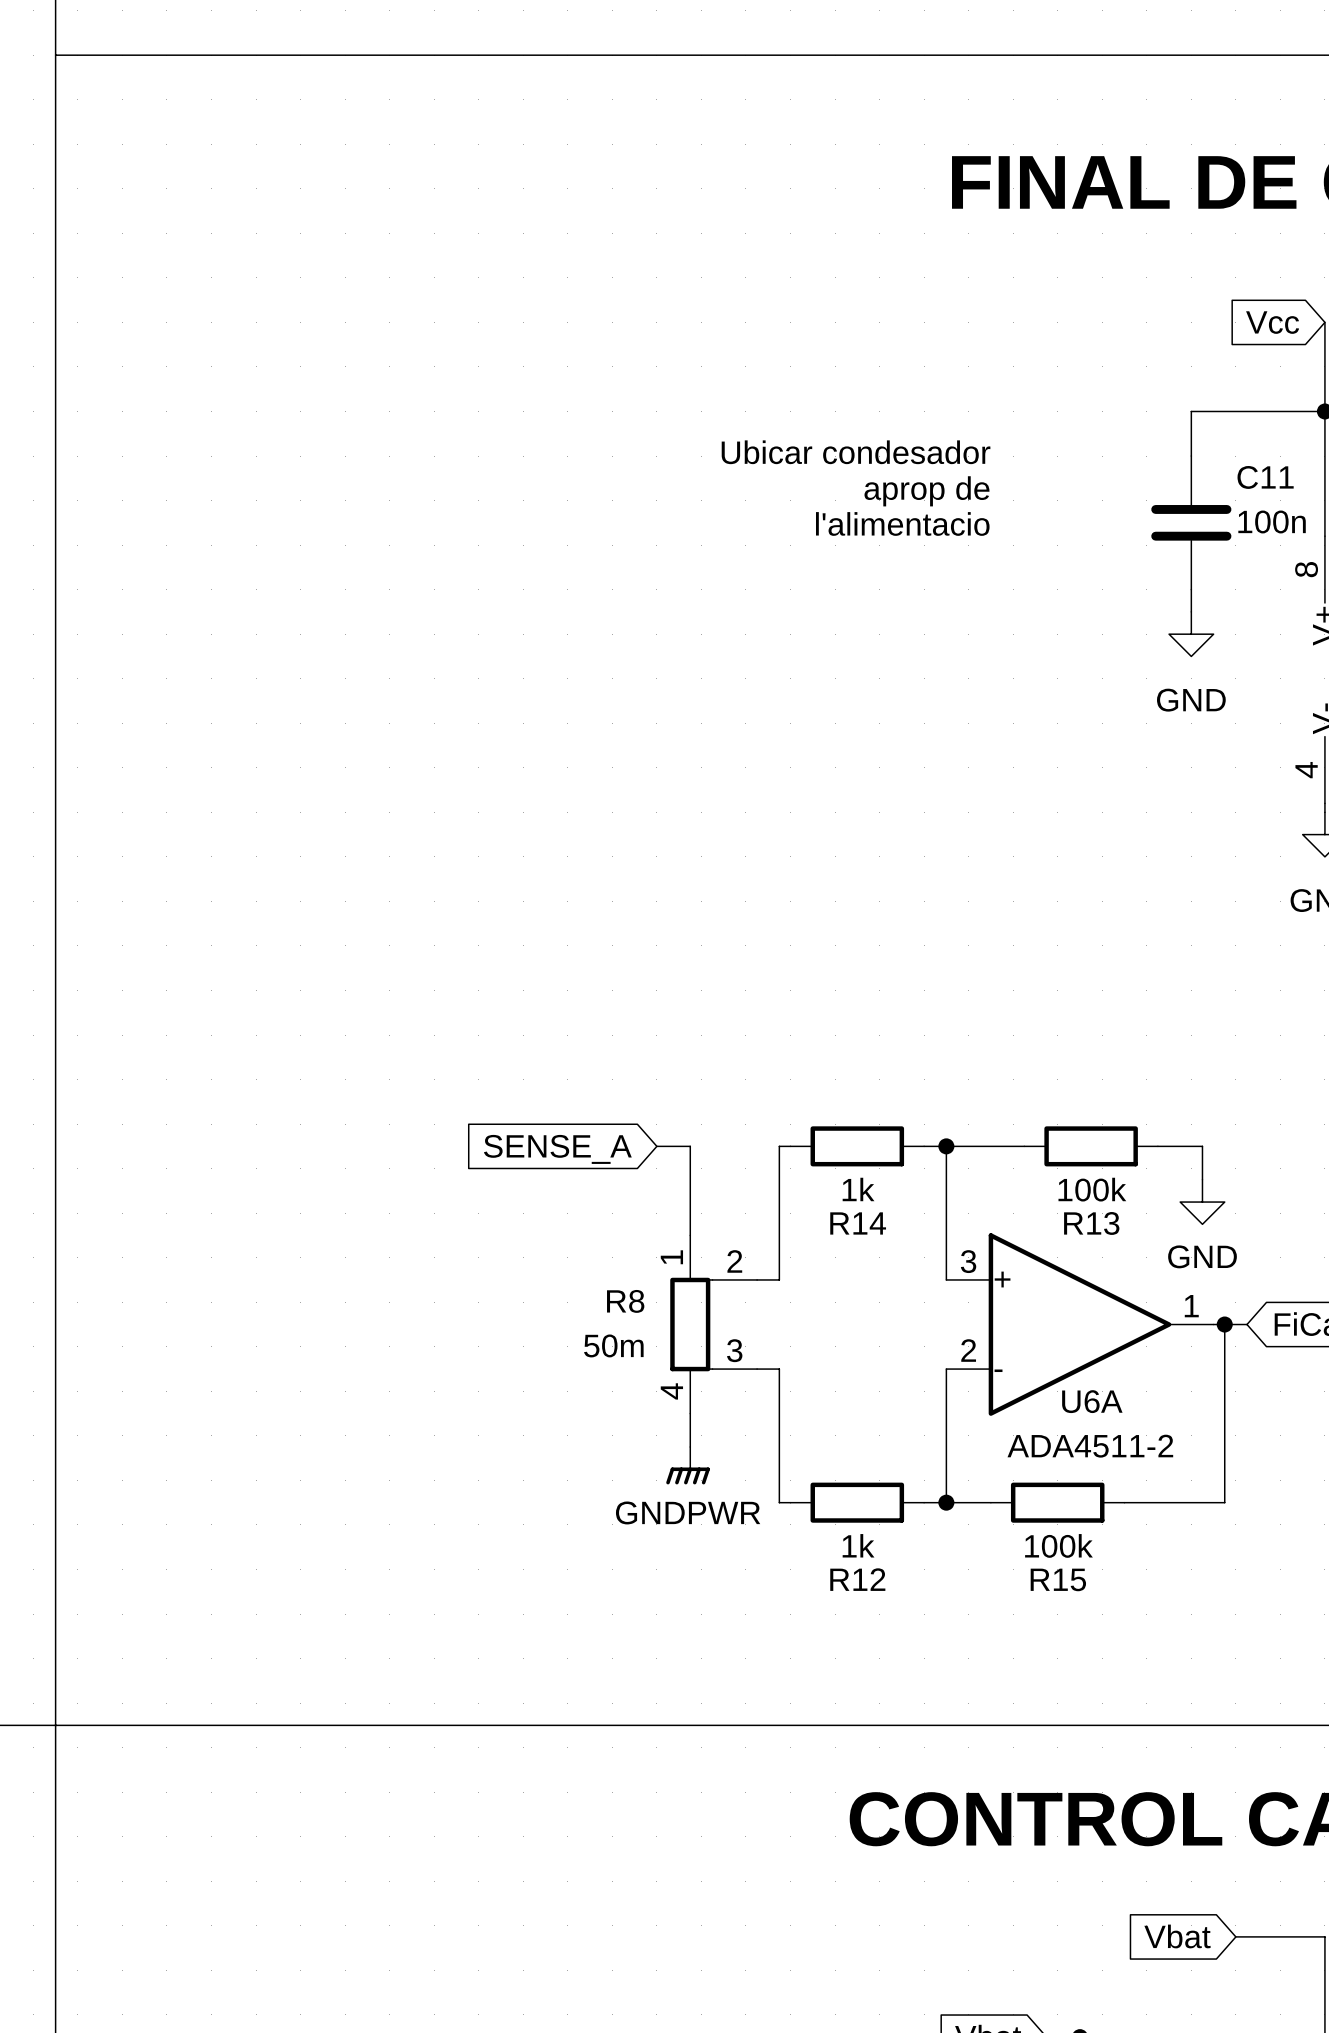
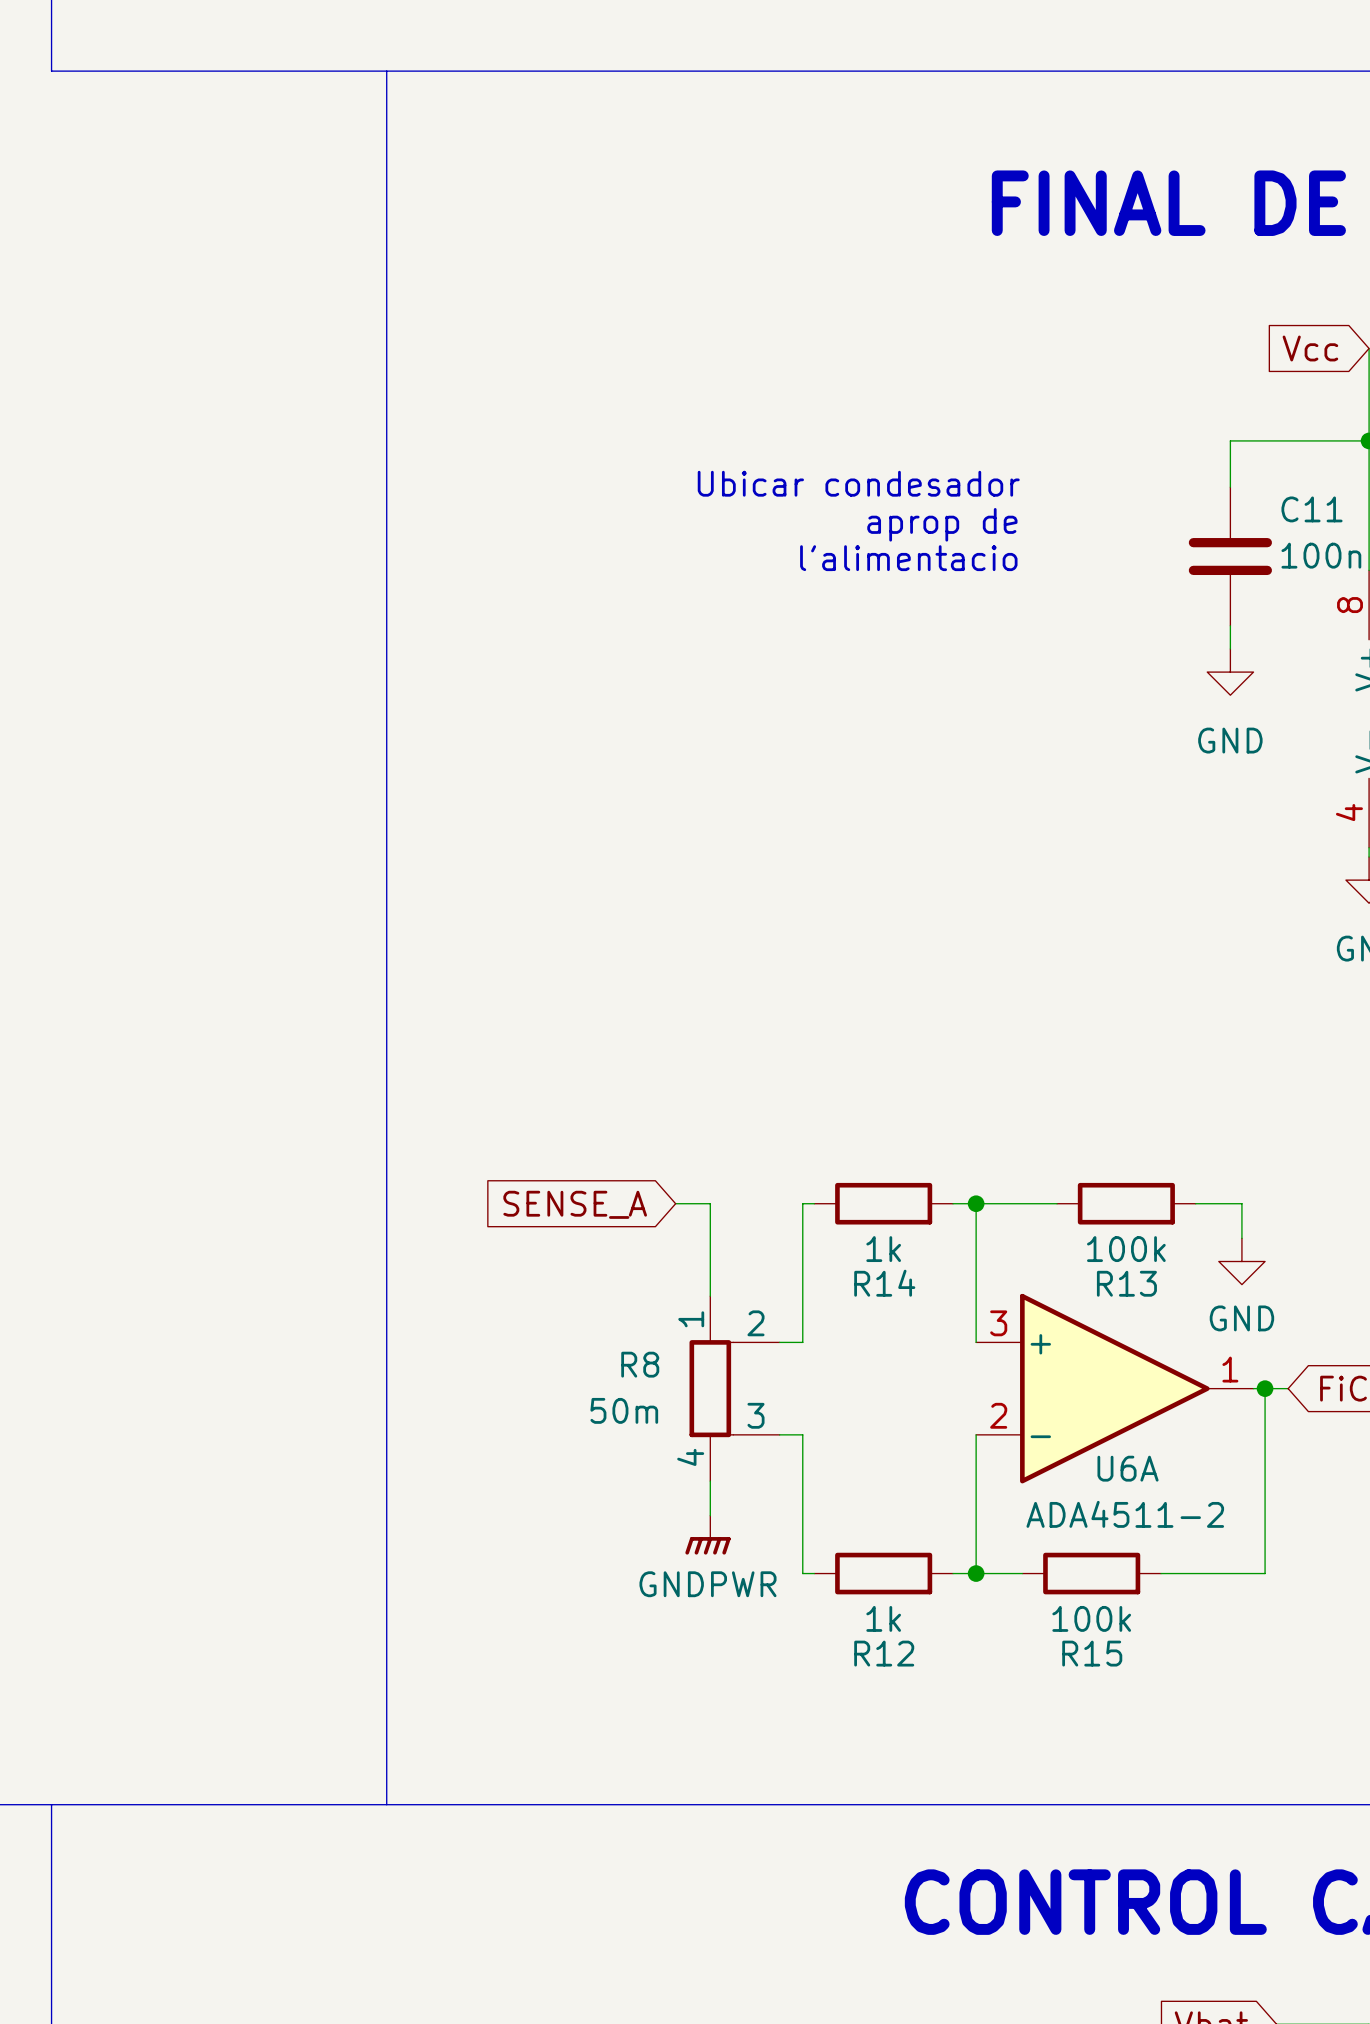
line: (55, 55) (55, 1725) -> (386, 71) (386, 1804)

